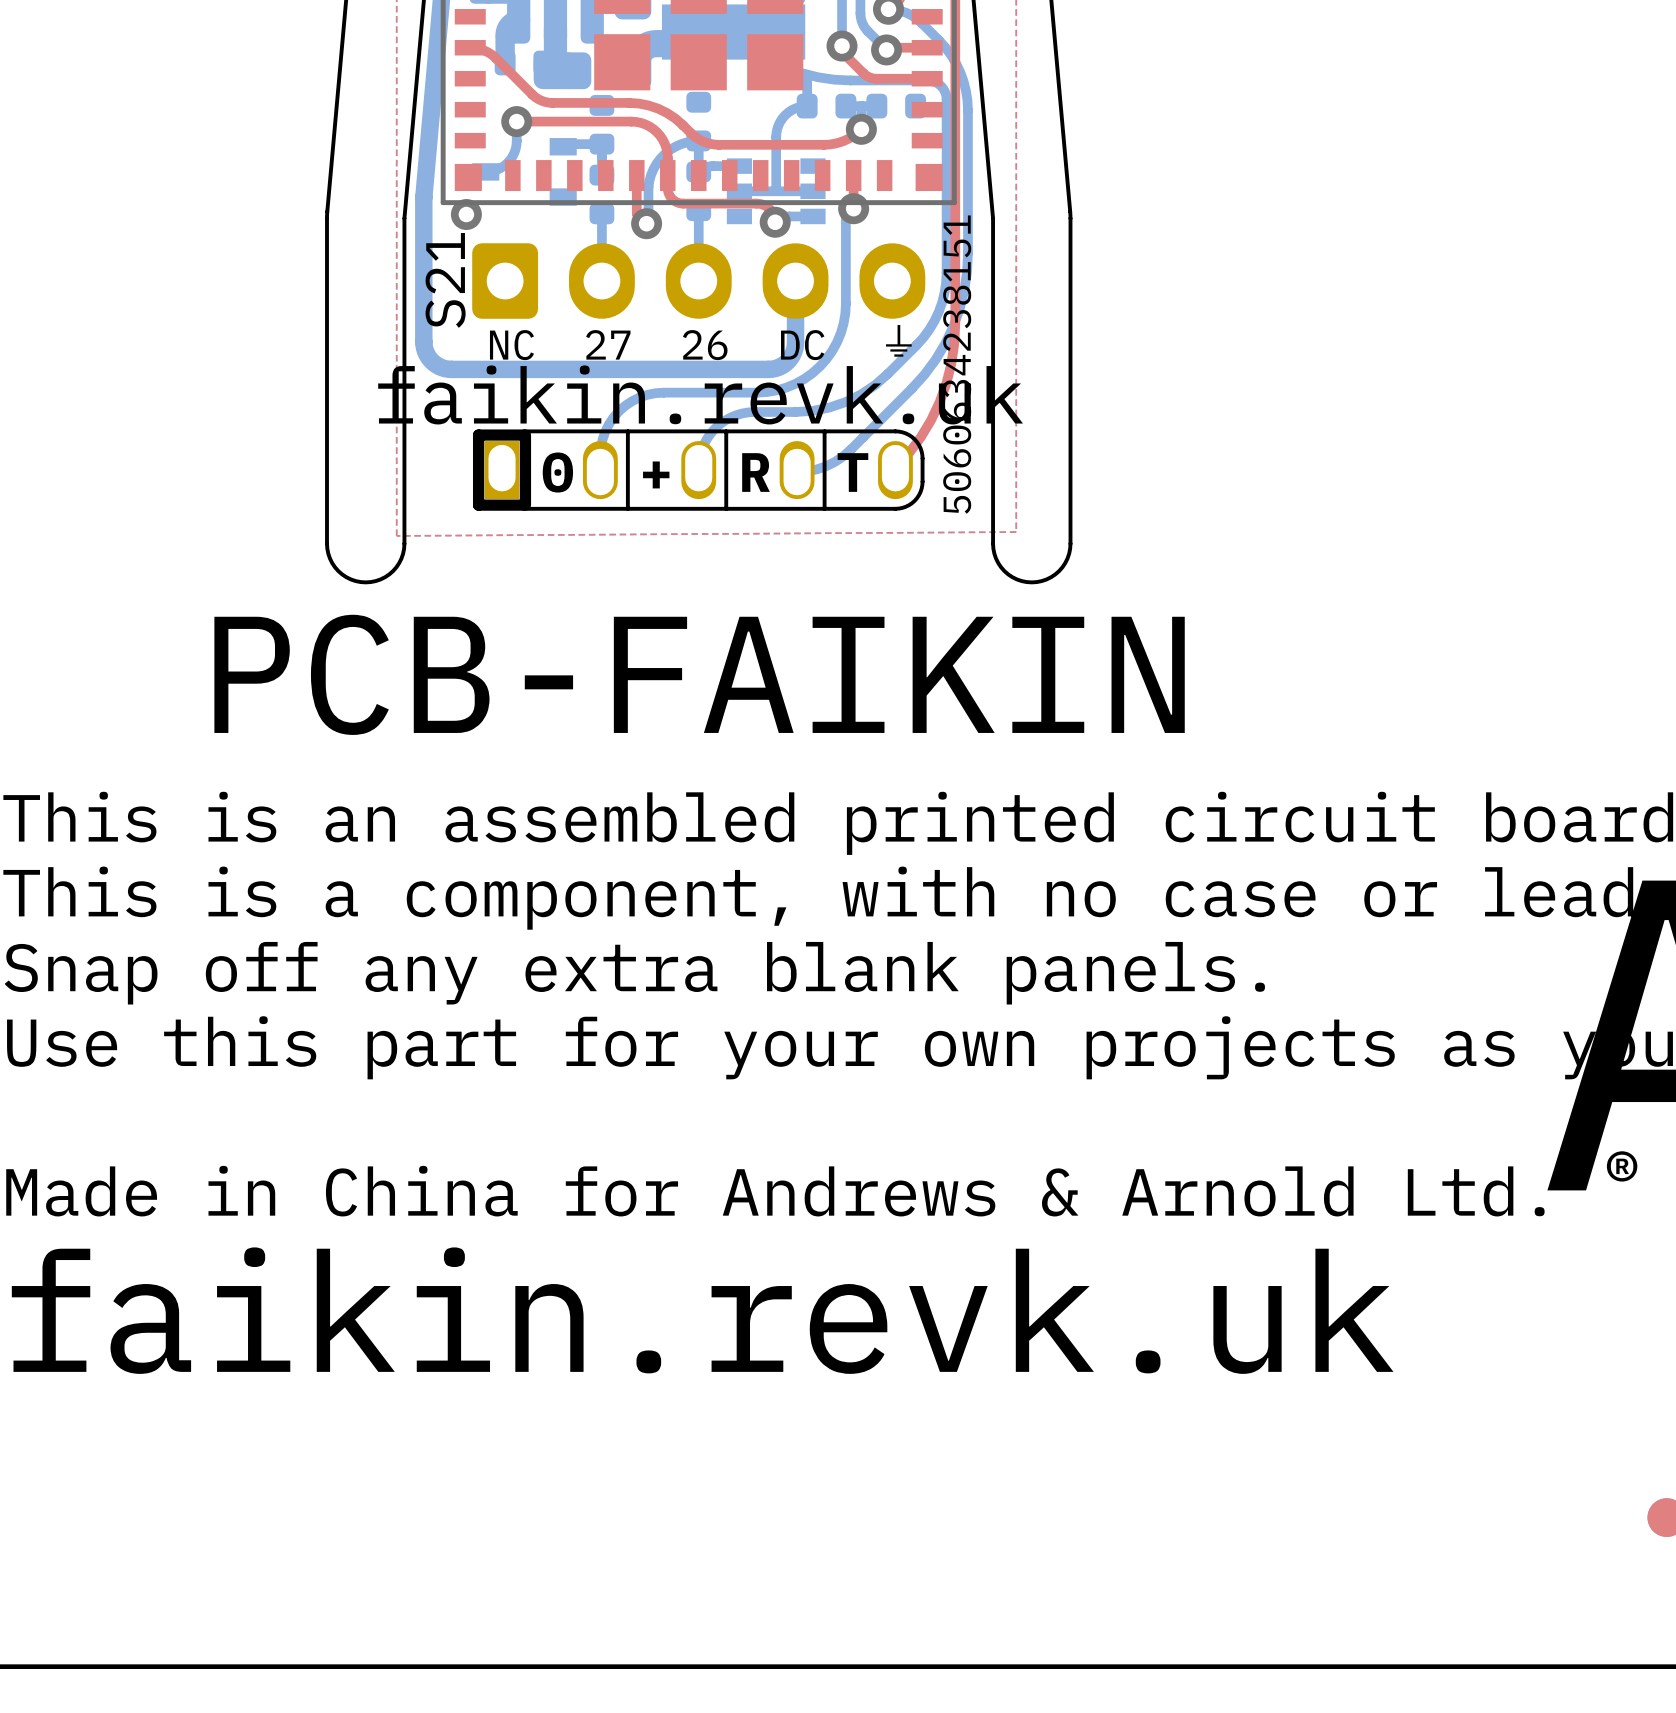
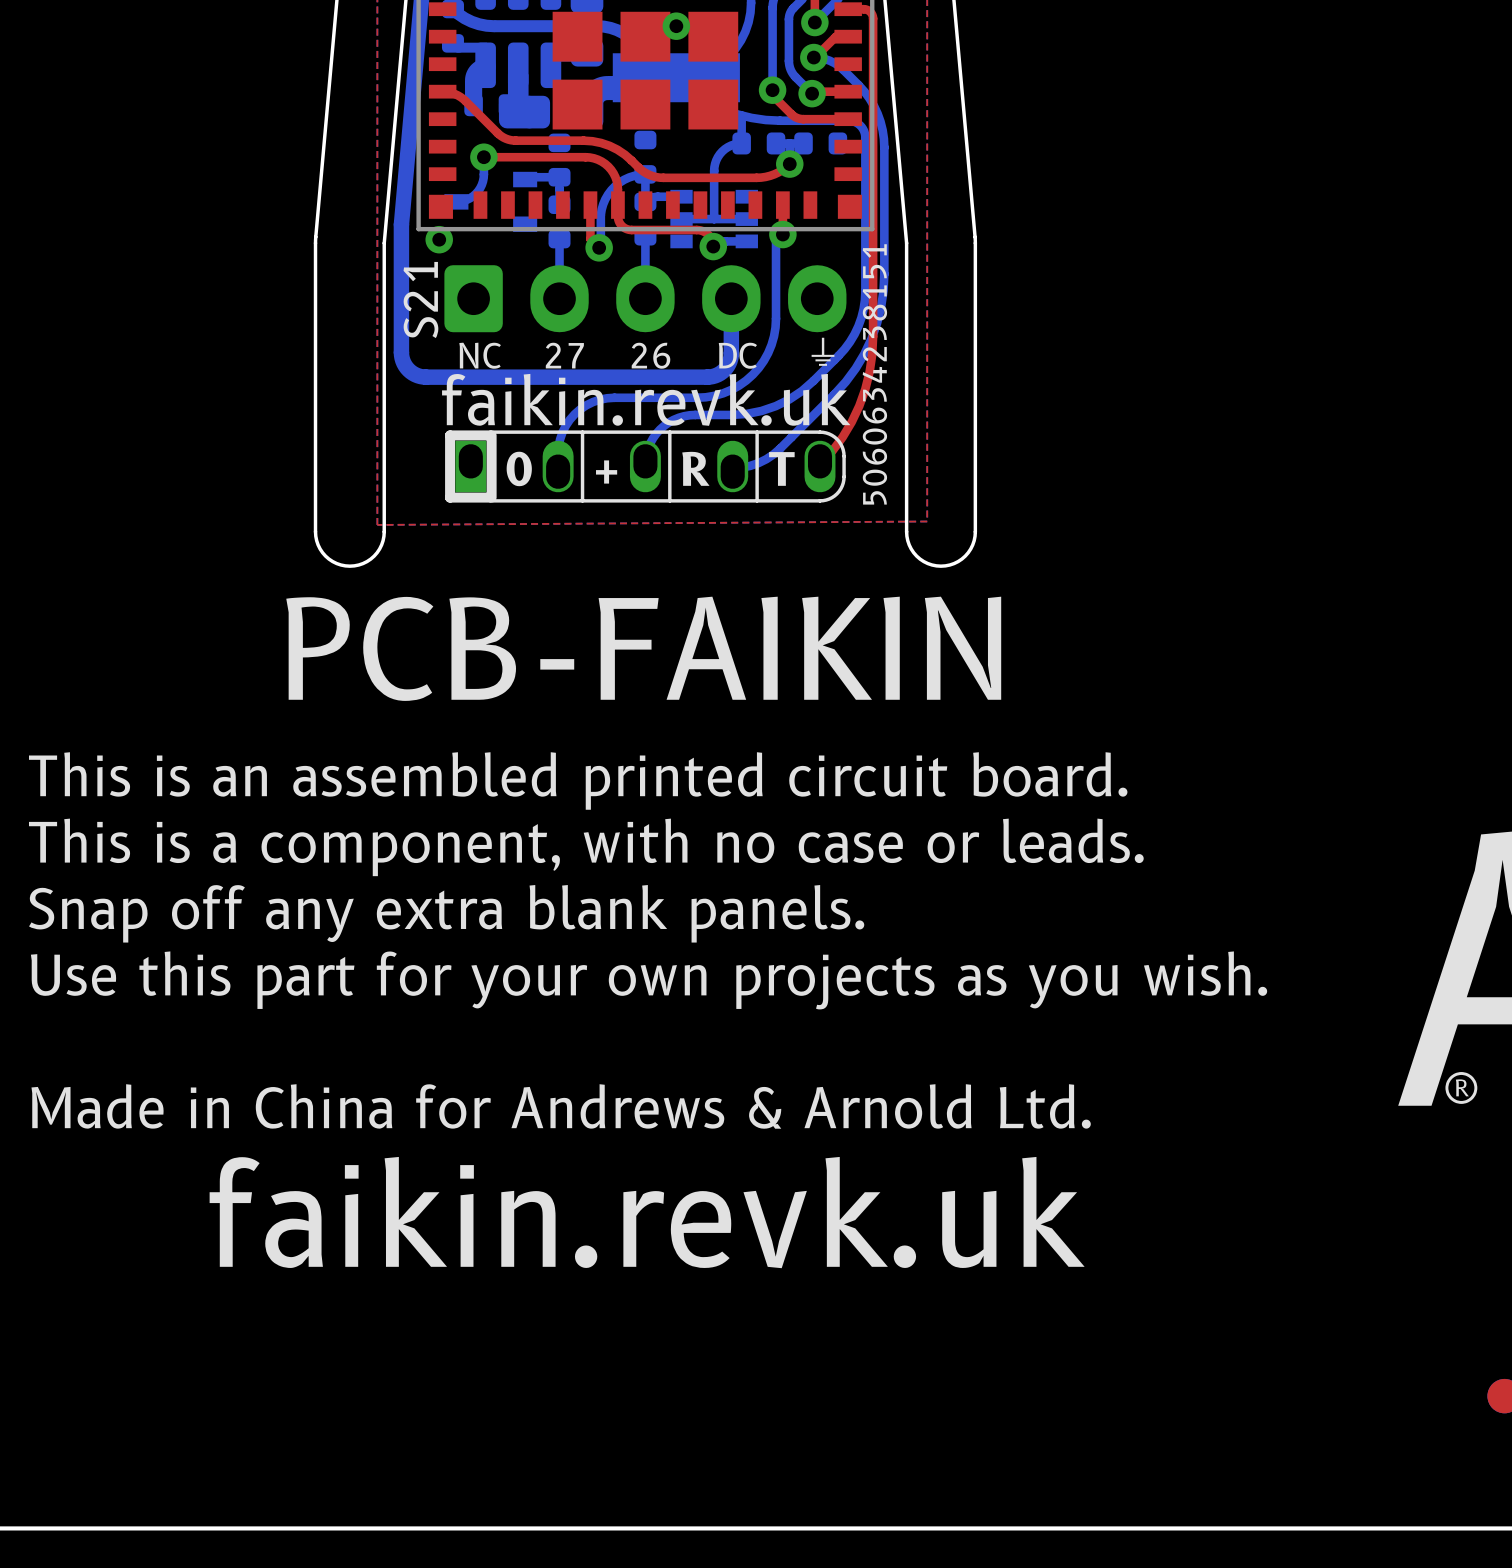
part footprint: [472, 429, 925, 511] -> [445, 430, 846, 503]

